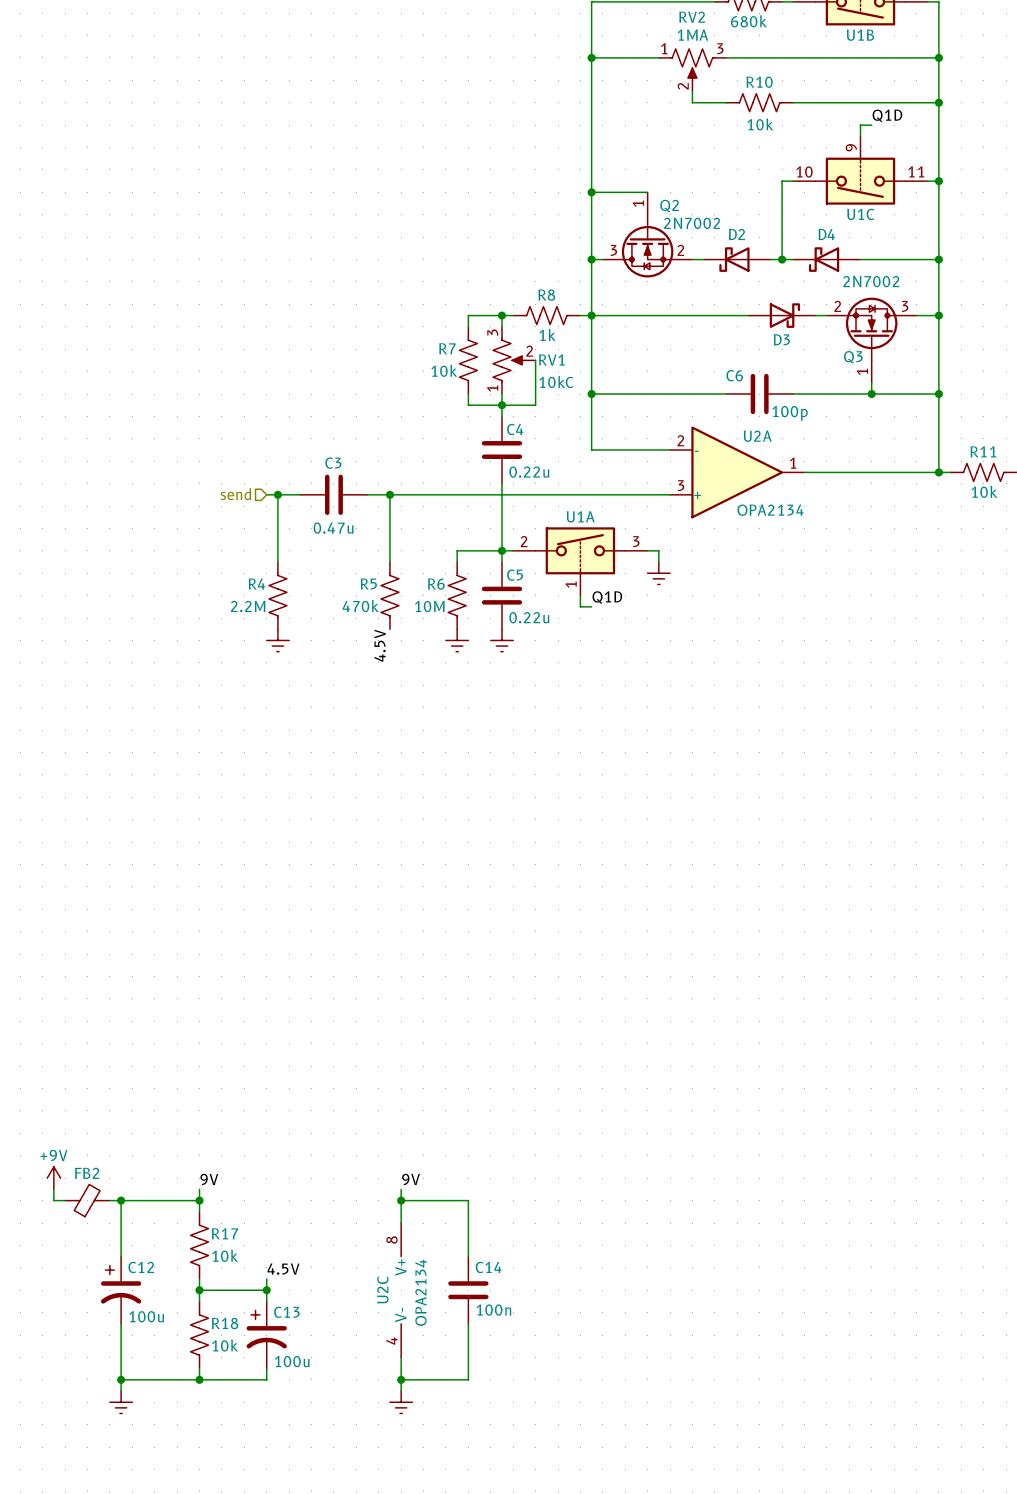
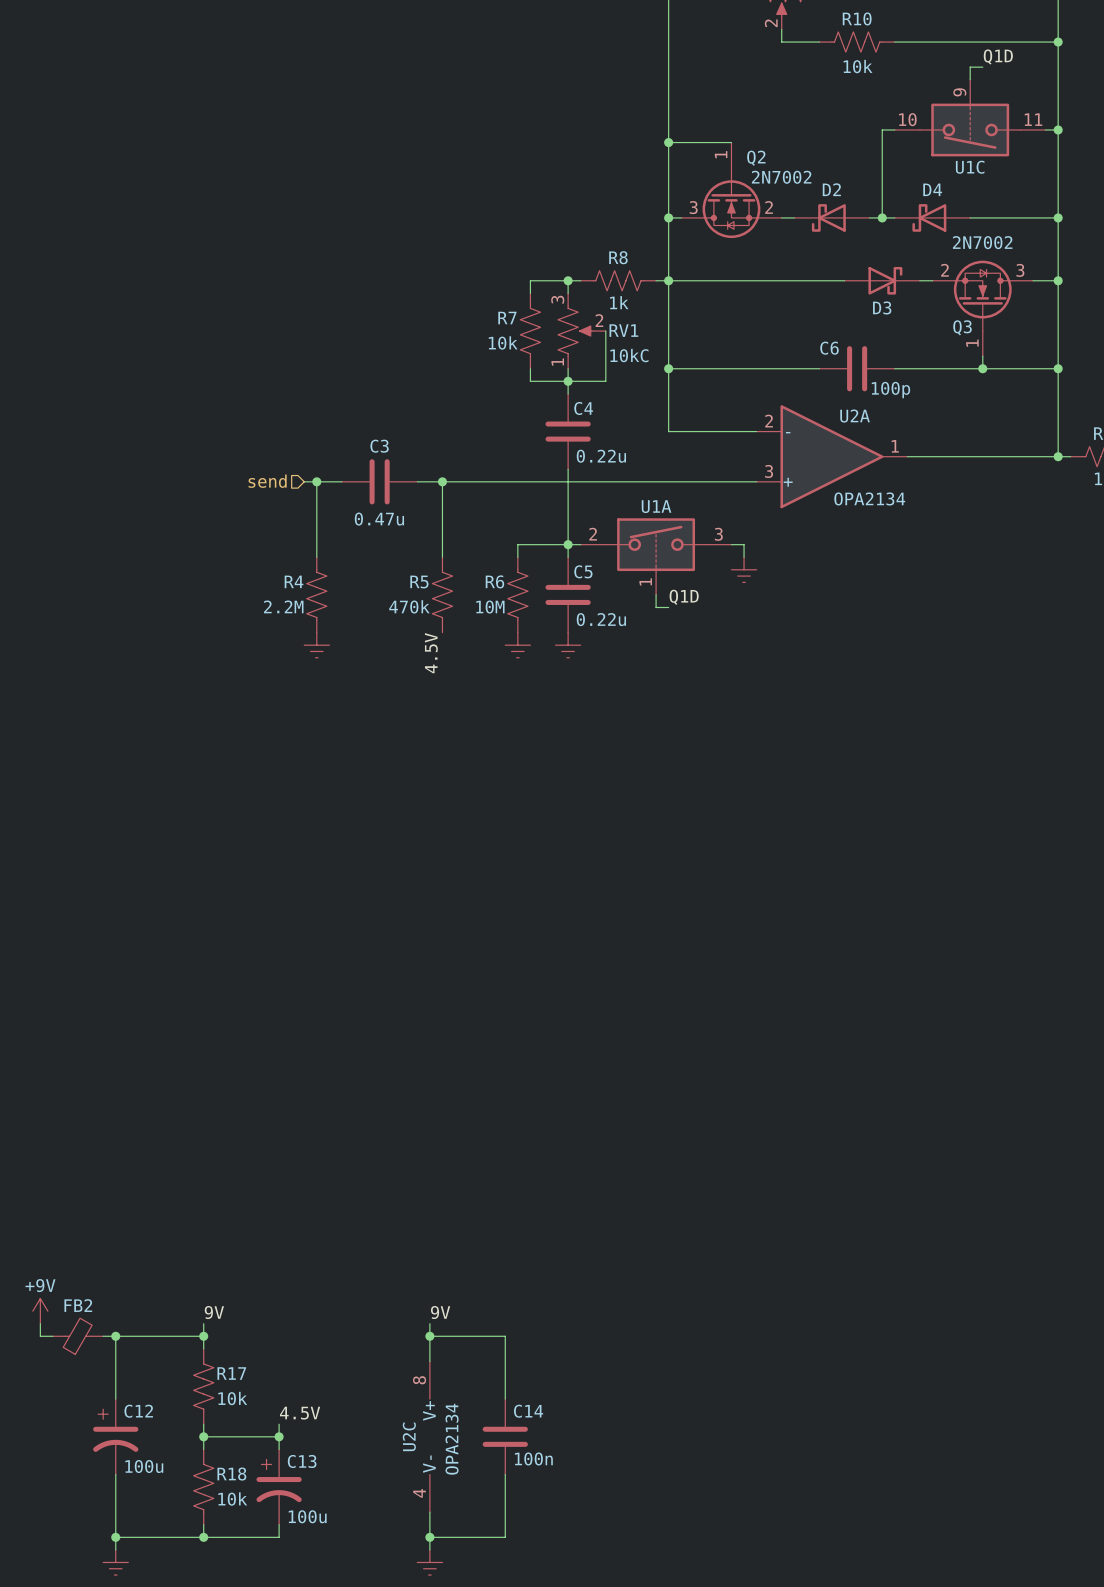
power symbol position: +9V (53, 1178) -> +9V (40, 1311)
label position: 9V (209, 1179) -> 9V (214, 1312)
label position: 9V (411, 1179) -> 9V (440, 1312)
wire: (53, 1189) (53, 1200) (65, 1200) -> (40, 1323) (40, 1336) (52, 1336)
wire: (199, 1189) (199, 1211) -> (203, 1323) (203, 1348)
wire: (401, 1189) (401, 1223) -> (429, 1323) (429, 1361)
FB2 position: (87, 1200) -> (78, 1336)
wire: (109, 1200) (199, 1200) -> (103, 1336) (203, 1336)
wire: (121, 1200) (121, 1256) -> (115, 1336) (115, 1399)
junction: (121, 1200) -> none
junction: (199, 1200) -> none
wire: (401, 1200) (468, 1200) (468, 1256) -> (429, 1336) (505, 1336) (505, 1399)
junction: (401, 1200) -> none
R17 position: (199, 1245) -> (203, 1386)
junction: none -> (115, 1336)
junction: none -> (203, 1336)
junction: none -> (429, 1336)
label position: 4.5V (283, 1269) -> 4.5V (300, 1413)
wire: (199, 1279) (199, 1301) -> (203, 1424) (203, 1449)
wire: (266, 1279) (266, 1301) -> (279, 1424) (279, 1449)
C12 position: (121, 1290) -> (115, 1436)
wire: (199, 1290) (266, 1290) -> (203, 1436) (279, 1436)
junction: (199, 1290) -> none
junction: (266, 1290) -> none
U2C position: (401, 1290) -> (429, 1436)
C14 position: (468, 1290) -> (505, 1436)
wire: (121, 1323) (121, 1391) -> (115, 1474) (115, 1549)
wire: (468, 1323) (468, 1379) (401, 1379) -> (505, 1474) (505, 1537) (429, 1537)
R18 position: (199, 1335) -> (203, 1487)
C13 position: (266, 1335) -> (279, 1487)
junction: none -> (203, 1436)
junction: none -> (279, 1436)
wire: (401, 1357) (401, 1391) -> (429, 1512) (429, 1549)
wire: (199, 1368) (199, 1379) -> (203, 1524) (203, 1537)
wire: (266, 1368) (266, 1379) (121, 1379) -> (279, 1524) (279, 1537) (115, 1537)
junction: (121, 1379) -> none
junction: (199, 1379) -> none
junction: (401, 1379) -> none
power symbol position: (121, 1402) -> (115, 1562)
power symbol position: (401, 1402) -> (429, 1562)
junction: none -> (115, 1537)
junction: none -> (203, 1537)
junction: none -> (429, 1537)

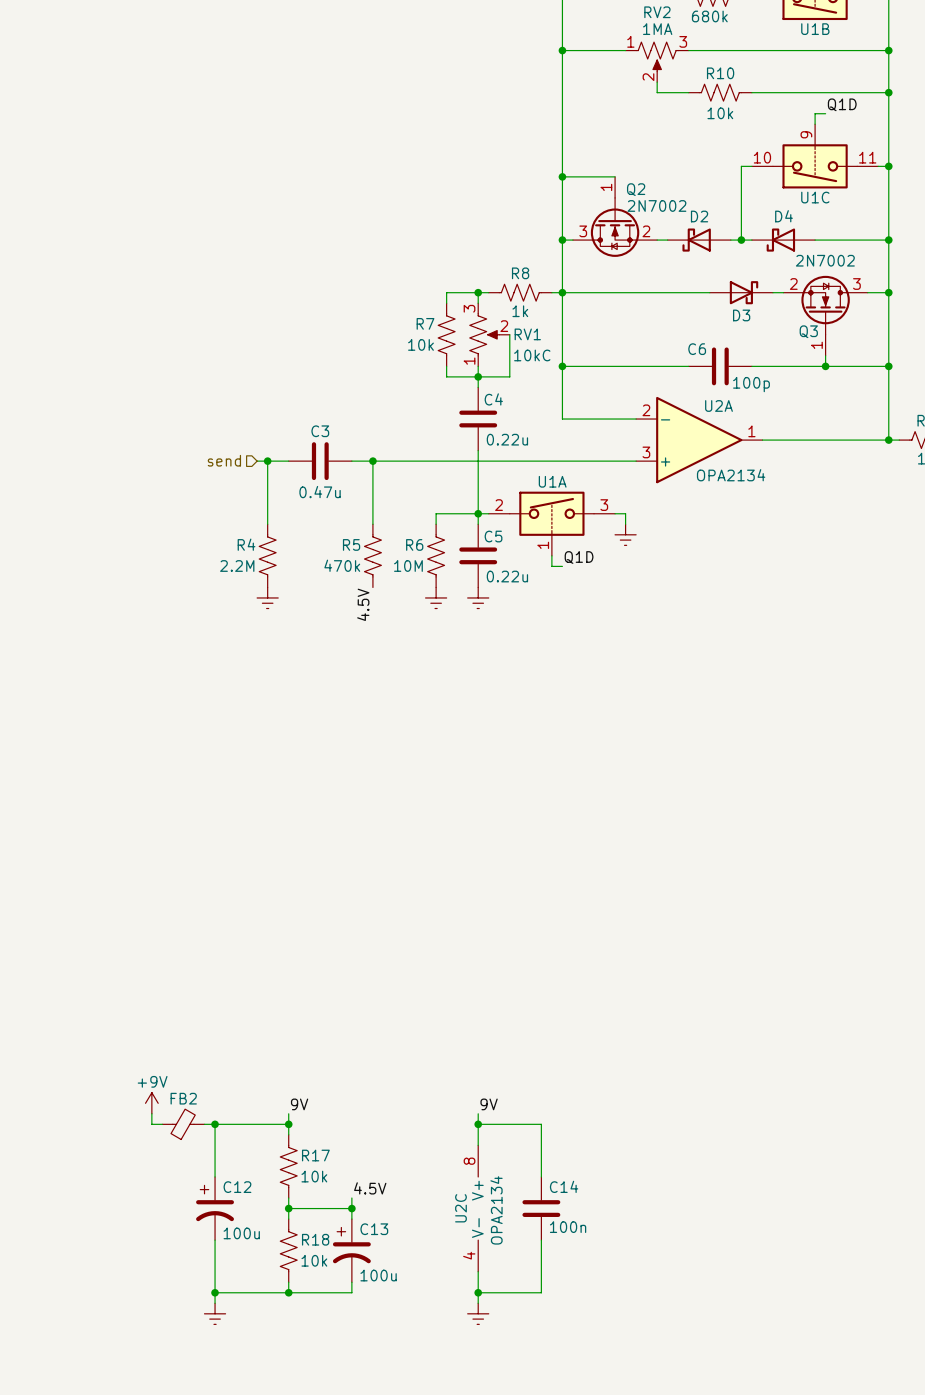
label: none -> 9V (299, 1104)
label: none -> 9V (489, 1104)
junction: none -> (215, 1124)
junction: none -> (288, 1124)
junction: none -> (478, 1124)
power symbol position: +9V (40, 1311) -> +9V (151, 1103)
label: 9V (214, 1312) -> none
label: 9V (440, 1312) -> none
wire: (40, 1323) (40, 1336) (52, 1336) -> (151, 1113) (151, 1124) (162, 1124)
wire: (203, 1323) (203, 1348) -> (288, 1113) (288, 1134)
wire: (429, 1323) (429, 1361) -> (478, 1113) (478, 1145)
FB2 position: (78, 1336) -> (183, 1124)
wire: (103, 1336) (203, 1336) -> (204, 1124) (288, 1124)
wire: (115, 1336) (115, 1399) -> (215, 1124) (215, 1176)
junction: (115, 1336) -> none
junction: (203, 1336) -> none
wire: (429, 1336) (505, 1336) (505, 1399) -> (478, 1124) (541, 1124) (541, 1176)
junction position: (429, 1336) -> (351, 1208)
junction: none -> (288, 1208)
R17 position: (203, 1386) -> (288, 1166)
label position: 4.5V (300, 1413) -> 4.5V (370, 1188)
wire: (203, 1424) (203, 1449) -> (288, 1198) (288, 1219)
wire: (279, 1424) (279, 1449) -> (351, 1198) (351, 1219)
C12 position: (115, 1436) -> (215, 1208)
wire: (203, 1436) (279, 1436) -> (288, 1208) (351, 1208)
junction: (203, 1436) -> none
junction: (279, 1436) -> none
U2C position: (429, 1436) -> (478, 1208)
C14 position: (505, 1436) -> (541, 1208)
wire: (115, 1474) (115, 1549) -> (215, 1240) (215, 1303)
junction: none -> (215, 1292)
junction: none -> (288, 1292)
wire: (505, 1474) (505, 1537) (429, 1537) -> (541, 1240) (541, 1292) (478, 1292)
junction: none -> (478, 1292)
R18 position: (203, 1487) -> (288, 1250)
C13 position: (279, 1487) -> (351, 1250)
power symbol: none -> (215, 1313)
power symbol: none -> (478, 1313)
wire: (429, 1512) (429, 1549) -> (478, 1271) (478, 1303)
wire: (203, 1524) (203, 1537) -> (288, 1282) (288, 1292)
wire: (279, 1524) (279, 1537) (115, 1537) -> (351, 1282) (351, 1292) (215, 1292)
junction: (115, 1537) -> none
junction: (203, 1537) -> none
junction: (429, 1537) -> none
power symbol: (115, 1562) -> none
power symbol: (429, 1562) -> none

